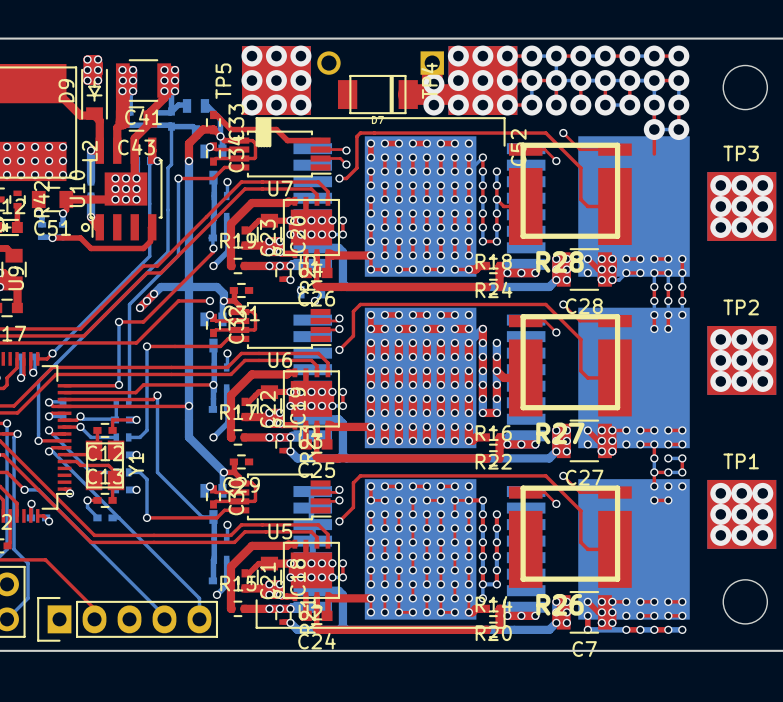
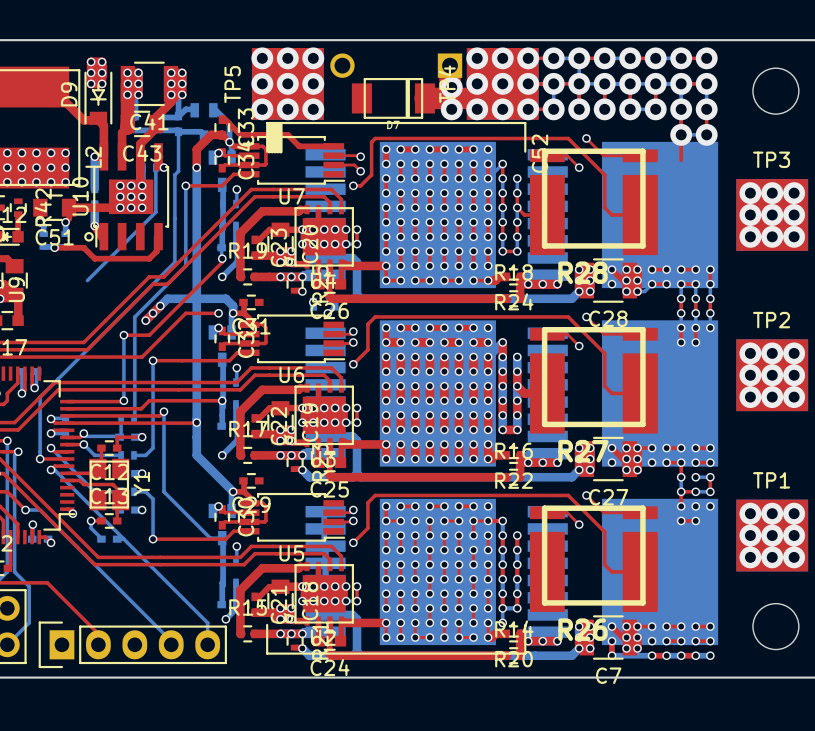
bottom track: (149, 203) (149, 256) (52, 353) -> (155, 212) (87, 280)
top track: (52, 353) (47, 358) (37, 358) -> none
via: (52, 353) -> none

